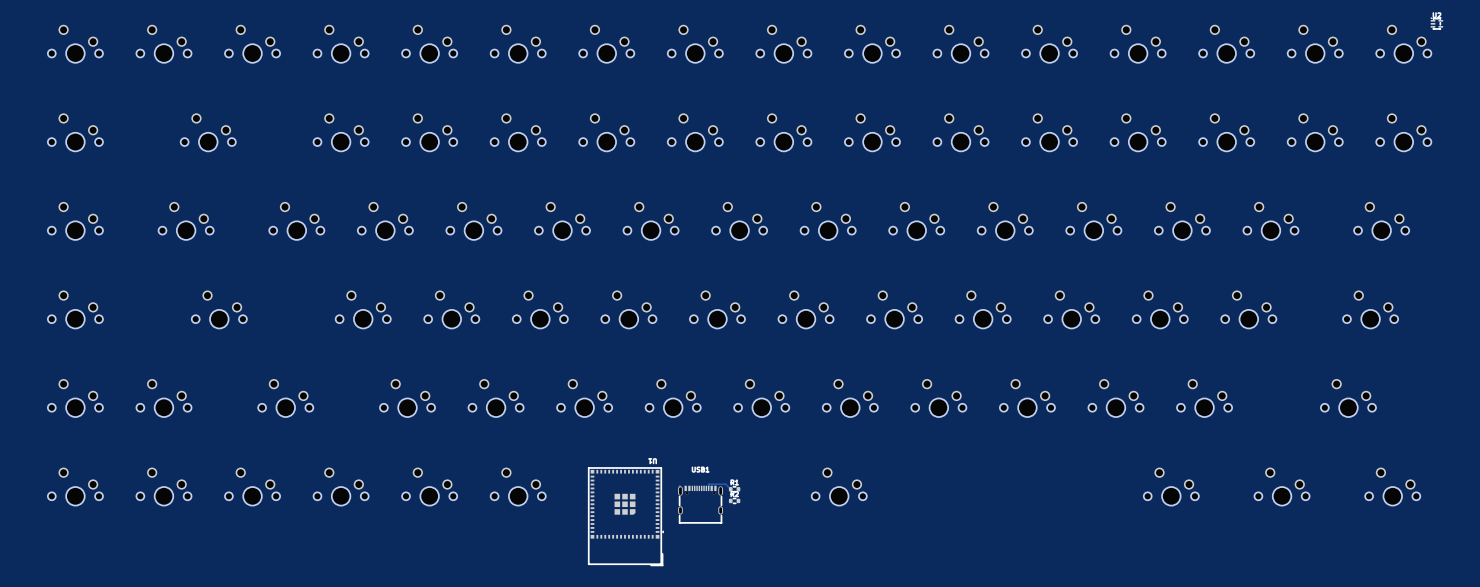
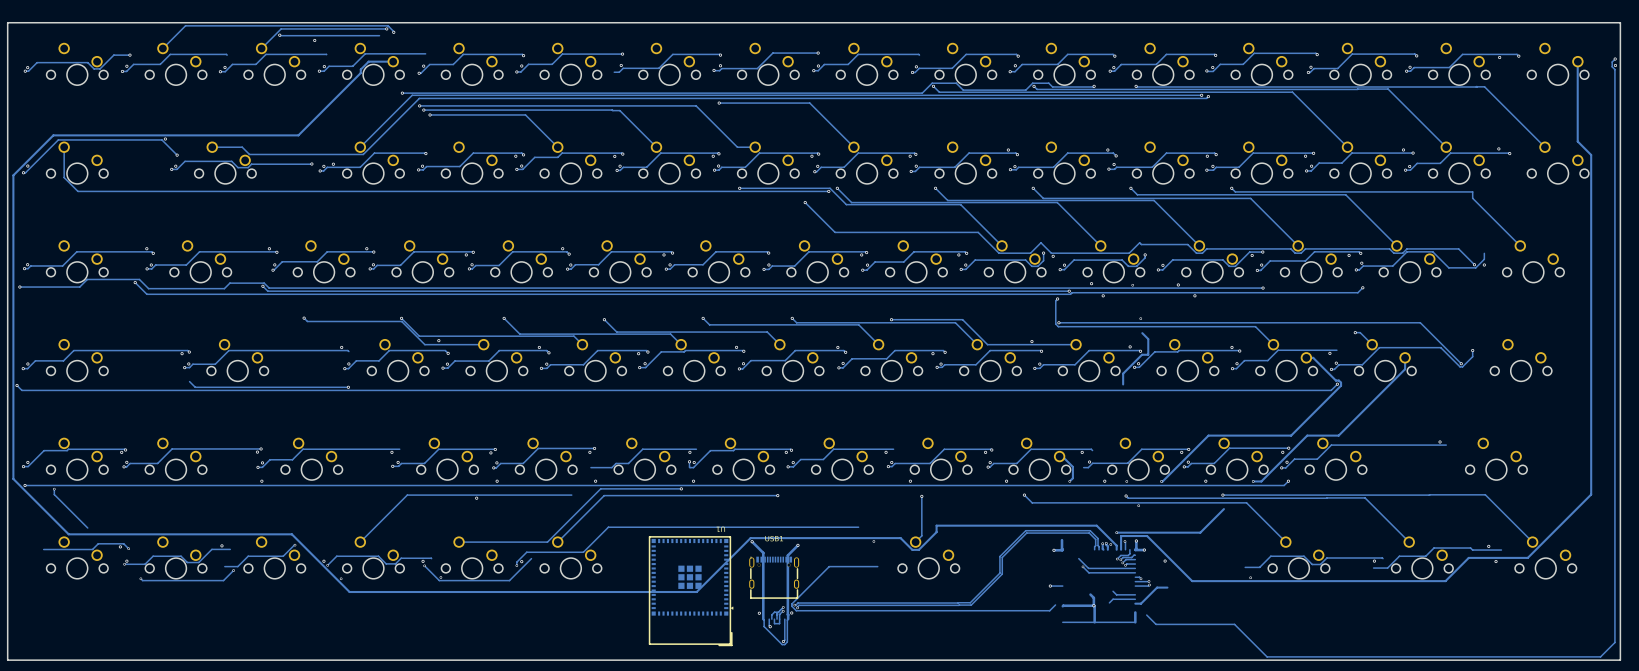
board edge: none -> (1620, 22) (7, 22) (7, 660) (1620, 660) (1620, 22)
track: none -> (386, 28) (281, 28) (261, 48)
via: none -> (386, 28)
track: none -> (393, 32) (388, 25) (185, 25) (162, 48)
via: none -> (393, 32)
track: none -> (279, 35) (379, 35)
via: none -> (279, 35)
via: none -> (314, 40)
part: (1436, 23) -> none
track: none -> (818, 53) (772, 53) (757, 68) (714, 70)
via: none -> (818, 53)
track: none -> (425, 53) (365, 53) (352, 66) (329, 66) (324, 71) (319, 71)
track: none -> (622, 54) (562, 54) (552, 64) (528, 64) (520, 71) (516, 71)
via: none -> (622, 54)
track: none -> (129, 55) (113, 55) (100, 68) (94, 68) (87, 62) (37, 62) (28, 71) (25, 71)
via: none -> (129, 55)
track: none -> (227, 55) (170, 54) (160, 64) (133, 64) (126, 71) (122, 71)
track: none -> (326, 54) (265, 54) (255, 64) (232, 64) (225, 71) (220, 71)
track: none -> (720, 55) (672, 54) (658, 68) (623, 68) (619, 72) (614, 72)
via: none -> (720, 55)
track: none -> (919, 55) (858, 54) (848, 64) (824, 64) (818, 70) (813, 70)
track: none -> (1317, 54) (1254, 53) (1243, 64) (1220, 64) (1213, 71) (1206, 70)
via: none -> (1317, 54)
track: none -> (523, 55) (463, 54) (453, 64) (429, 64) (419, 73)
via: none -> (523, 55)
track: none -> (1018, 56) (1016, 54) (966, 54) (952, 68) (919, 68) (912, 72)
via: none -> (1018, 56)
track: none -> (1114, 56) (1113, 54) (1067, 54) (1057, 64) (1022, 64) (1015, 71) (1010, 71)
via: none -> (1114, 56)
track: none -> (1215, 55) (1166, 54) (1156, 64) (1121, 64) (1114, 71) (1110, 71)
via: none -> (1215, 55)
track: none -> (1416, 55) (1414, 54) (1352, 54) (1337, 68) (1314, 68) (1308, 72)
via: none -> (1416, 55)
track: none -> (1518, 56) (1517, 54) (1462, 54) (1449, 67) (1414, 67) (1410, 71) (1406, 71)
via: none -> (1518, 56)
via: none -> (1499, 57)
track: none -> (1615, 59) (1612, 62) (1612, 66) (1614, 69) (1614, 642) (1600, 656) (1267, 656) (1234, 624) (1156, 624) (1146, 615)
via: none -> (1615, 59)
track: none -> (393, 61) (368, 61) (360, 69) (360, 73) (298, 135) (53, 135) (13, 175) (13, 478) (68, 534) (291, 534) (349, 592) (696, 592) (750, 538) (900, 538) (912, 549) (918, 549) (936, 532) (936, 525) (1096, 525) (1116, 545) (1116, 549)
track: none -> (1577, 61) (1577, 141) (1591, 154) (1591, 494) (1527, 557) (1468, 557) (1445, 581) (1192, 581) (1147, 536) (1121, 536) (1121, 549)
via: none -> (126, 66)
via: none -> (423, 66)
via: none -> (521, 66)
via: none -> (621, 65)
via: none -> (720, 65)
via: none -> (818, 66)
via: none -> (1015, 65)
via: none -> (1615, 65)
via: none -> (225, 67)
via: none -> (324, 66)
via: none -> (916, 66)
via: none -> (1212, 67)
via: none -> (1310, 67)
via: none -> (1410, 67)
via: none -> (27, 67)
via: none -> (1113, 67)
via: none -> (714, 70)
via: none -> (813, 70)
via: none -> (25, 71)
via: none -> (122, 71)
via: none -> (220, 71)
via: none -> (319, 71)
via: none -> (516, 71)
via: none -> (1010, 71)
via: none -> (1110, 71)
via: none -> (1206, 70)
via: none -> (1406, 71)
via: none -> (912, 72)
via: none -> (1308, 72)
via: none -> (419, 73)
track: none -> (933, 86) (939, 92) (1292, 92) (1347, 147)
via: none -> (933, 86)
track: none -> (1034, 86) (1037, 89) (1388, 89) (1446, 147)
via: none -> (1034, 86)
track: none -> (1094, 86) (1052, 87) (1048, 83) (1032, 83) (1025, 90) (963, 90) (956, 83) (932, 83) (922, 93) (402, 93)
via: none -> (1094, 86)
track: none -> (1136, 86) (1484, 86) (1544, 147)
via: none -> (1136, 86)
via: none -> (402, 93)
track: none -> (1201, 95) (412, 95) (360, 147)
via: none -> (1201, 95)
track: none -> (1208, 96) (1206, 98) (419, 98) (363, 154) (249, 154) (242, 147) (212, 147)
via: none -> (1208, 96)
track: none -> (719, 103) (809, 103) (853, 147)
via: none -> (719, 103)
track: none -> (419, 105) (696, 105) (737, 147) (755, 147)
via: none -> (419, 105)
track: none -> (423, 110) (619, 110) (656, 147)
via: none -> (423, 110)
track: none -> (430, 114) (525, 114) (557, 147)
via: none -> (430, 114)
via: none -> (165, 139)
track: none -> (64, 147) (64, 177) (77, 191) (828, 191)
via: none -> (1498, 148)
via: none -> (1008, 150)
via: none -> (1107, 150)
via: none -> (1403, 149)
track: none -> (1313, 153) (1253, 153) (1238, 167) (1216, 167) (1213, 170) (1206, 170)
via: none -> (1313, 153)
track: none -> (1413, 153) (1351, 153) (1341, 163) (1319, 163) (1311, 170) (1306, 170)
via: none -> (1413, 153)
track: none -> (425, 153) (374, 153) (360, 167) (327, 167) (323, 170) (320, 170)
via: none -> (425, 153)
track: none -> (622, 154) (562, 153) (557, 157) (534, 157) (522, 169) (516, 169)
via: none -> (622, 154)
track: none -> (718, 153) (660, 153) (646, 167) (623, 167) (617, 170)
via: none -> (718, 153)
track: none -> (818, 154) (759, 153) (745, 167) (721, 167) (718, 170) (714, 170)
via: none -> (818, 154)
track: none -> (915, 154) (858, 153) (844, 167) (821, 167) (814, 171)
via: none -> (915, 154)
track: none -> (1509, 153) (1450, 153) (1440, 163) (1417, 163) (1410, 170) (1405, 170)
via: none -> (1509, 153)
track: none -> (177, 155) (161, 139) (58, 139) (23, 172)
via: none -> (177, 155)
track: none -> (523, 154) (521, 153) (473, 153) (459, 166) (426, 166) (423, 169) (418, 169)
via: none -> (523, 154)
track: none -> (1017, 154) (969, 153) (954, 167) (919, 167) (915, 171) (911, 171)
via: none -> (1017, 154)
track: none -> (1216, 154) (1166, 153) (1152, 167) (1116, 167) (1114, 169) (1108, 169)
via: none -> (1216, 154)
via: none -> (515, 156)
via: none -> (614, 156)
via: none -> (713, 156)
via: none -> (811, 156)
via: none -> (910, 156)
track: none -> (1116, 155) (1113, 153) (1067, 153) (1053, 167) (1018, 167) (1016, 169) (1010, 169)
via: none -> (1116, 155)
via: none -> (1207, 156)
via: none -> (1305, 156)
track: none -> (311, 164) (251, 164) (248, 167) (238, 167) (231, 161) (185, 161) (176, 169) (171, 169)
via: none -> (311, 164)
via: none -> (333, 164)
via: none -> (1114, 164)
via: none -> (27, 166)
via: none -> (175, 166)
via: none -> (323, 166)
via: none -> (422, 166)
via: none -> (521, 166)
via: none -> (620, 166)
via: none -> (718, 166)
via: none -> (817, 166)
via: none -> (916, 166)
via: none -> (1014, 166)
via: none -> (1212, 166)
via: none -> (1311, 166)
via: none -> (1409, 166)
via: none -> (171, 169)
via: none -> (418, 169)
via: none -> (516, 169)
via: none -> (1010, 169)
via: none -> (1108, 169)
via: none -> (320, 170)
via: none -> (617, 170)
via: none -> (714, 170)
via: none -> (1206, 170)
via: none -> (1306, 170)
via: none -> (1405, 170)
via: none -> (814, 171)
via: none -> (911, 171)
via: none -> (23, 172)
track: none -> (739, 188) (830, 188) (846, 204) (960, 204) (1002, 245)
via: none -> (739, 188)
track: none -> (837, 188) (851, 202) (1057, 202) (1100, 245)
via: none -> (837, 188)
track: none -> (935, 188) (947, 200) (1153, 200) (1199, 245)
via: none -> (935, 188)
track: none -> (1033, 188) (1043, 198) (1250, 198) (1298, 245)
via: none -> (1033, 188)
track: none -> (1130, 188) (1137, 194) (1345, 194) (1396, 245)
via: none -> (1130, 188)
track: none -> (1231, 188) (1235, 191) (1472, 191) (1472, 198) (1520, 245)
via: none -> (1231, 188)
via: none -> (828, 191)
track: none -> (805, 202) (835, 232) (978, 232) (999, 253) (1030, 253) (1040, 242) (1051, 253) (1129, 253) (1139, 242) (1141, 244) (1187, 244) (1196, 253) (1202, 253) (1206, 248) (1290, 248) (1295, 253) (1301, 253) (1305, 248) (1389, 248) (1393, 253) (1402, 253) (1406, 248) (1458, 248) (1474, 264)
via: none -> (805, 202)
via: none -> (146, 248)
via: none -> (269, 248)
via: none -> (366, 248)
via: none -> (562, 248)
track: none -> (276, 252) (199, 251) (186, 265) (155, 265) (151, 268) (147, 268)
via: none -> (276, 252)
track: none -> (373, 252) (327, 251) (317, 261) (282, 261) (273, 270)
via: none -> (373, 252)
track: none -> (473, 252) (414, 251) (400, 265) (377, 265) (373, 268) (370, 268)
via: none -> (473, 252)
track: none -> (866, 252) (808, 251) (794, 266) (772, 266) (768, 269) (764, 269)
via: none -> (866, 252)
track: none -> (1262, 252) (1249, 252) (1235, 266) (1229, 266) (1222, 259) (1172, 259) (1162, 269) (1158, 269)
via: none -> (1262, 252)
track: none -> (153, 253) (76, 251) (62, 265) (30, 265) (24, 268)
via: none -> (153, 253)
track: none -> (672, 253) (611, 251) (598, 264) (575, 264) (571, 269) (567, 269)
via: none -> (672, 253)
track: none -> (768, 253) (715, 251) (703, 264) (674, 264) (670, 269) (666, 269)
via: none -> (768, 253)
track: none -> (966, 253) (913, 251) (903, 262) (875, 262) (866, 270) (862, 270)
via: none -> (966, 253)
track: none -> (1043, 253) (1043, 260) (1037, 266) (1031, 266) (1025, 260) (975, 260) (965, 269) (961, 269)
via: none -> (1043, 253)
track: none -> (1360, 253) (1314, 251) (1305, 260) (1270, 260) (1260, 270) (1257, 270)
via: none -> (1360, 253)
track: none -> (1484, 253) (1484, 259) (1475, 267) (1448, 267) (1432, 251) (1407, 251) (1392, 266) (1363, 266) (1356, 269)
track: none -> (569, 254) (566, 251) (512, 251) (499, 265) (475, 265) (469, 268)
via: none -> (569, 254)
via: none -> (466, 254)
via: none -> (664, 254)
via: none -> (861, 254)
via: none -> (958, 254)
track: none -> (1145, 254) (1145, 257) (1136, 266) (1128, 266) (1122, 260) (1074, 260) (1064, 269) (1060, 269)
via: none -> (1145, 254)
via: none -> (1252, 255)
via: none -> (1349, 255)
via: none -> (1053, 256)
via: none -> (1361, 263)
via: none -> (27, 264)
via: none -> (373, 264)
via: none -> (472, 264)
via: none -> (1474, 264)
via: none -> (151, 265)
via: none -> (274, 264)
via: none -> (570, 265)
via: none -> (670, 264)
via: none -> (768, 265)
via: none -> (867, 265)
via: none -> (965, 265)
via: none -> (1064, 265)
via: none -> (1162, 265)
via: none -> (1261, 265)
via: none -> (1484, 265)
via: none -> (24, 268)
via: none -> (147, 268)
via: none -> (370, 268)
via: none -> (469, 268)
via: none -> (567, 269)
via: none -> (666, 269)
via: none -> (273, 270)
via: none -> (764, 269)
via: none -> (862, 270)
via: none -> (961, 269)
via: none -> (1060, 269)
via: none -> (1158, 269)
via: none -> (1356, 269)
via: none -> (1257, 270)
track: none -> (135, 282) (146, 294) (1070, 294) (1072, 292) (1357, 292) (1362, 287)
via: none -> (135, 282)
via: none -> (1091, 283)
via: none -> (1132, 285)
via: none -> (1178, 284)
track: none -> (19, 287) (79, 287) (87, 279) (139, 279) (148, 288) (224, 288) (229, 283) (264, 283) (269, 288) (1263, 288)
via: none -> (19, 287)
track: none -> (262, 286) (267, 291) (1069, 291)
via: none -> (262, 286)
via: none -> (1263, 288)
via: none -> (1362, 287)
via: none -> (1069, 291)
via: none -> (1103, 295)
via: none -> (1194, 295)
track: none -> (1057, 298) (1055, 300) (1055, 324) (1058, 326) (1255, 326) (1273, 344)
via: none -> (1057, 298)
track: none -> (304, 318) (307, 321) (401, 321) (424, 344) (483, 344)
via: none -> (304, 318)
track: none -> (401, 318) (419, 336) (573, 336) (582, 344)
via: none -> (401, 318)
track: none -> (504, 318) (519, 334) (670, 334) (681, 344)
via: none -> (504, 318)
track: none -> (703, 318) (709, 324) (858, 324) (878, 344)
via: none -> (703, 318)
track: none -> (792, 318) (796, 322) (955, 322) (977, 344)
via: none -> (792, 318)
via: none -> (1140, 318)
track: none -> (604, 319) (616, 332) (767, 332) (779, 344)
via: none -> (604, 319)
track: none -> (891, 319) (962, 319) (987, 344) (1076, 344)
via: none -> (891, 319)
track: none -> (1058, 322) (1420, 322) (1461, 363)
via: none -> (1058, 322)
track: none -> (1355, 332) (1360, 332) (1372, 344)
via: none -> (1355, 332)
track: none -> (1142, 333) (1148, 339) (1148, 354) (1142, 354) (1123, 373) (1123, 384)
via: none -> (438, 340)
via: none -> (1031, 341)
via: none -> (1130, 346)
via: none -> (341, 347)
via: none -> (539, 347)
via: none -> (736, 347)
via: none -> (837, 347)
via: none -> (1231, 347)
track: none -> (1336, 350) (1278, 350) (1267, 360) (1244, 360) (1236, 368) (1232, 368)
track: none -> (1472, 350) (1472, 356) (1462, 366) (1460, 366) (1440, 347) (1379, 347) (1362, 364) (1339, 364) (1334, 369) (1331, 369)
via: none -> (1472, 350)
track: none -> (348, 351) (228, 350) (215, 364) (192, 364) (189, 367) (184, 367)
track: none -> (743, 351) (661, 351) (645, 367) (639, 367)
via: none -> (743, 351)
track: none -> (1041, 351) (990, 350) (975, 364) (944, 364) (942, 367) (937, 367)
via: none -> (1041, 351)
track: none -> (1140, 351) (1089, 350) (1075, 364) (1043, 364) (1039, 368) (1034, 368)
via: none -> (1140, 351)
track: none -> (1239, 351) (1154, 351) (1139, 367) (1134, 367)
via: none -> (1239, 351)
track: none -> (189, 352) (73, 350) (63, 360) (35, 360) (27, 368) (23, 368)
via: none -> (189, 352)
track: none -> (548, 352) (546, 350) (499, 350) (488, 361) (454, 361) (447, 368) (442, 368)
via: none -> (548, 352)
track: none -> (647, 352) (597, 350) (583, 364) (550, 364) (546, 368) (541, 368)
via: none -> (647, 352)
track: none -> (845, 352) (843, 350) (795, 350) (785, 360) (751, 360) (742, 368) (739, 368)
via: none -> (845, 352)
track: none -> (945, 352) (943, 350) (894, 350) (886, 358) (852, 358) (843, 367) (838, 367)
via: none -> (945, 352)
via: none -> (182, 353)
track: none -> (448, 353) (445, 350) (389, 350) (379, 360) (356, 360) (348, 368) (344, 368)
via: none -> (448, 353)
via: none -> (638, 353)
via: none -> (932, 353)
via: none -> (1329, 353)
track: none -> (1306, 357) (1313, 357) (1335, 380) (1338, 380) (1341, 385) (1291, 435) (1208, 435) (1161, 481)
track: none -> (1405, 357) (1405, 369) (1338, 435) (1307, 435) (1261, 481) (1253, 481)
via: none -> (27, 363)
via: none -> (188, 363)
via: none -> (348, 363)
via: none -> (645, 363)
via: none -> (743, 363)
via: none -> (843, 363)
via: none -> (1138, 363)
via: none -> (1236, 363)
via: none -> (1336, 363)
via: none -> (1461, 363)
via: none -> (447, 364)
via: none -> (546, 364)
via: none -> (941, 364)
via: none -> (1039, 364)
via: none -> (937, 367)
via: none -> (1134, 367)
via: none -> (184, 367)
via: none -> (442, 368)
via: none -> (541, 368)
via: none -> (639, 367)
via: none -> (838, 367)
via: none -> (1034, 368)
via: none -> (23, 368)
via: none -> (344, 368)
via: none -> (739, 368)
via: none -> (1232, 368)
via: none -> (1331, 369)
track: none -> (189, 381) (195, 387) (348, 387)
track: none -> (1337, 384) (1331, 390) (21, 390) (17, 385)
via: none -> (1337, 384)
via: none -> (17, 385)
via: none -> (348, 387)
via: none -> (1440, 441)
track: none -> (1446, 445) (1331, 445) (1317, 459) (1294, 459) (1285, 467) (1281, 467)
track: none -> (594, 448) (538, 448) (523, 463) (500, 463) (493, 467)
via: none -> (594, 448)
track: none -> (1288, 448) (1229, 448) (1214, 463) (1191, 463) (1188, 466) (1184, 466)
via: none -> (1288, 448)
track: none -> (261, 448) (172, 448) (157, 463) (130, 463) (124, 466)
via: none -> (261, 448)
track: none -> (399, 449) (303, 449) (292, 459) (270, 459) (262, 467) (257, 467)
track: none -> (495, 449) (438, 449) (424, 463) (401, 463) (398, 466) (392, 466)
via: none -> (495, 449)
track: none -> (696, 449) (642, 449) (628, 463) (616, 463) (611, 467) (590, 467)
track: none -> (893, 449) (833, 449) (823, 459) (800, 459) (793, 466) (788, 466)
track: none -> (1188, 449) (1141, 449) (1127, 463) (1092, 463) (1088, 467) (1083, 467)
via: none -> (1188, 449)
track: none -> (125, 450) (44, 450) (28, 466) (23, 466)
via: none -> (125, 450)
track: none -> (791, 450) (710, 450) (693, 467) (689, 467) (689, 461)
via: none -> (791, 450)
track: none -> (991, 450) (944, 449) (930, 463) (895, 463) (892, 466) (888, 466)
via: none -> (991, 450)
track: none -> (1092, 450) (1031, 449) (1016, 463) (993, 463) (988, 467)
via: none -> (257, 452)
via: none -> (121, 452)
via: none -> (391, 452)
via: none -> (490, 452)
via: none -> (589, 452)
via: none -> (689, 452)
via: none -> (786, 452)
via: none -> (886, 452)
via: none -> (985, 452)
via: none -> (1082, 452)
via: none -> (1181, 452)
via: none -> (1282, 452)
track: none -> (1059, 456) (1062, 456) (1072, 466) (1072, 478) (1069, 481)
via: none -> (689, 461)
via: none -> (1089, 462)
via: none -> (27, 462)
via: none -> (126, 462)
via: none -> (262, 462)
via: none -> (398, 462)
via: none -> (496, 462)
via: none -> (694, 462)
via: none -> (793, 462)
via: none -> (891, 462)
via: none -> (990, 462)
via: none -> (1188, 462)
via: none -> (1287, 462)
via: none -> (23, 466)
via: none -> (392, 466)
via: none -> (888, 466)
via: none -> (124, 466)
via: none -> (257, 467)
via: none -> (788, 466)
via: none -> (988, 467)
via: none -> (1184, 466)
via: none -> (493, 467)
via: none -> (1281, 467)
via: none -> (261, 481)
via: none -> (497, 481)
via: none -> (595, 481)
via: none -> (693, 481)
via: none -> (910, 481)
via: none -> (1006, 481)
via: none -> (1069, 481)
via: none -> (1104, 481)
via: none -> (1126, 481)
via: none -> (1161, 481)
via: none -> (1205, 481)
via: none -> (1253, 481)
track: none -> (1288, 481) (1284, 485) (25, 485)
via: none -> (1288, 481)
via: none -> (25, 485)
track: none -> (681, 488) (600, 488) (547, 542) (459, 542)
via: none -> (681, 488)
track: none -> (54, 489) (54, 494) (87, 528)
via: none -> (54, 489)
track: none -> (571, 495) (407, 495) (360, 542)
track: none -> (777, 495) (604, 495) (557, 542)
via: none -> (777, 495)
track: none -> (1024, 495) (1032, 502) (1246, 502) (1285, 542)
via: none -> (1024, 495)
track: none -> (1222, 495) (1485, 494) (1532, 542)
via: none -> (1222, 495)
track: none -> (921, 496) (921, 535) (915, 542)
via: none -> (921, 496)
track: none -> (1126, 496) (1128, 498) (1365, 497) (1409, 542)
via: none -> (1126, 496)
via: none -> (476, 498)
via: none -> (1138, 505)
track: none -> (1223, 509) (1200, 532) (1116, 532)
track: none -> (858, 527) (608, 527) (583, 552) (526, 552) (516, 562) (516, 565)
via: none -> (1116, 532)
track: none -> (1062, 540) (1062, 549) (1053, 550)
track: none -> (1136, 540) (1135, 549) (1144, 550)
via: none -> (1136, 540)
track: none -> (752, 541) (763, 552) (764, 626) (782, 644) (787, 642) (787, 555) (797, 545)
via: none -> (752, 541)
via: none -> (873, 541)
track: none -> (1124, 541) (1125, 549)
via: none -> (1124, 541)
track: none -> (1106, 543) (1107, 549)
via: none -> (1106, 543)
track: none -> (1102, 543) (1103, 549)
via: none -> (1102, 543)
via: none -> (1110, 544)
track: none -> (295, 545) (283, 556) (248, 556) (237, 566) (224, 566)
via: none -> (295, 545)
via: none -> (797, 545)
via: none -> (221, 545)
via: none -> (1488, 546)
via: none -> (120, 546)
track: none -> (128, 548) (123, 543) (98, 543) (92, 549) (43, 549)
via: none -> (128, 548)
track: none -> (230, 549) (211, 549) (198, 562) (187, 562) (181, 556) (153, 556) (145, 564) (124, 564)
track: none -> (1094, 549) (1095, 539) (1089, 533) (1026, 533) (1002, 557) (1002, 574) (971, 605) (798, 605) (797, 607)
track: none -> (1099, 549) (1098, 538) (1090, 530) (1025, 530) (999, 556) (999, 573) (970, 602) (798, 603) (794, 605)
track: none -> (1129, 549) (1128, 555) (1120, 555) (1117, 559)
via: none -> (1144, 550)
track: none -> (1501, 550) (1434, 548) (1425, 556) (1399, 556) (1387, 568) (1373, 568)
via: none -> (1053, 550)
track: none -> (1135, 555) (1131, 557) (1123, 557) (1120, 559)
track: none -> (431, 558) (401, 558) (395, 563) (386, 563) (378, 556) (336, 556) (327, 565)
track: none -> (531, 558) (509, 580) (439, 580) (424, 565)
track: none -> (1078, 558) (1088, 568) (1135, 568)
via: none -> (1117, 559)
track: none -> (1383, 558) (1326, 558) (1320, 564) (1312, 564) (1304, 556) (1270, 556) (1259, 567) (1245, 567)
track: (708, 488) (709, 484) (725, 484) (730, 489) -> none
via: none -> (1120, 559)
track: none -> (1135, 559) (1126, 559) (1122, 562)
via: none -> (126, 561)
via: none -> (323, 561)
via: none -> (423, 561)
part: (734, 489) -> none
via: none -> (1165, 561)
via: none -> (1374, 561)
via: none -> (521, 561)
via: none -> (1496, 561)
via: none -> (1122, 562)
via: none -> (124, 564)
track: none -> (1135, 564) (1125, 565)
via: none -> (327, 565)
via: none -> (424, 565)
via: none -> (516, 565)
via: none -> (1125, 565)
track: none -> (877, 566) (829, 566) (791, 603) (791, 606) (796, 610) (1049, 610) (1055, 604)
track: none -> (1082, 566) (1088, 572) (1135, 572)
via: none -> (1082, 566)
track: none -> (233, 570) (223, 580) (142, 580) (140, 578)
via: none -> (233, 570)
part: (734, 500) -> none
via: none -> (440, 577)
track: none -> (1135, 577) (1141, 578)
via: none -> (1250, 577)
via: none -> (140, 578)
via: none -> (341, 578)
via: none -> (1141, 578)
track: none -> (1149, 581) (1135, 581)
via: none -> (1149, 581)
track: none -> (1149, 585) (1135, 586)
via: none -> (1149, 585)
via: none -> (1050, 586)
track: none -> (1062, 586) (1050, 586)
track: none -> (1167, 587) (1157, 587) (1141, 603) (1135, 603)
track: none -> (1113, 591) (1116, 594) (1135, 594)
track: none -> (1090, 594) (1093, 597) (1093, 605)
track: none -> (1135, 599) (1113, 599) (1109, 602)
via: none -> (794, 605)
track: none -> (1093, 605) (1094, 622)
track: none -> (1093, 605) (1062, 606)
via: none -> (1093, 605)
track: none -> (783, 607) (777, 613) (777, 619)
via: none -> (783, 607)
via: none -> (797, 607)
track: none -> (783, 611) (779, 614)
via: none -> (783, 611)
track: none -> (778, 612) (771, 614) (771, 619)
track: none -> (1135, 612) (1135, 622) (1062, 622)
via: none -> (759, 613)
via: none -> (791, 612)
track: none -> (779, 614) (779, 623) (774, 623) (774, 619)
track: none -> (769, 619) (770, 626)
track: none -> (784, 619) (783, 641)
via: none -> (770, 626)
via: none -> (783, 641)

